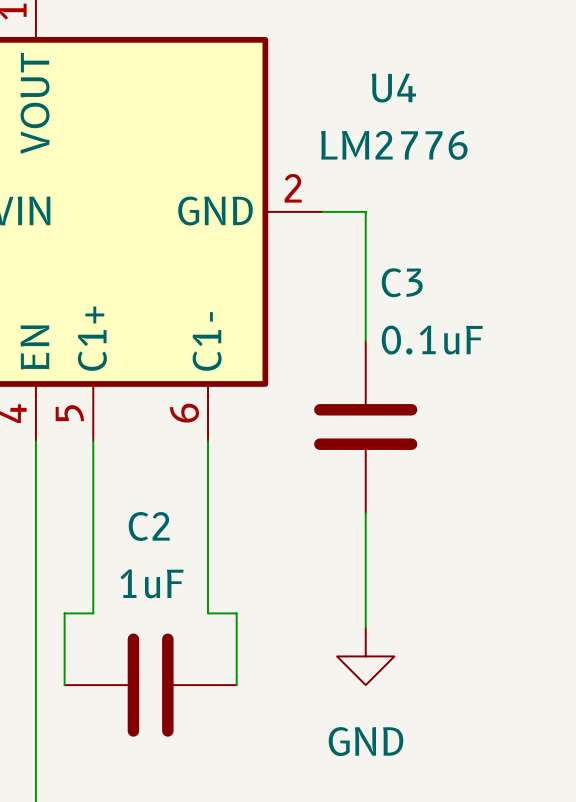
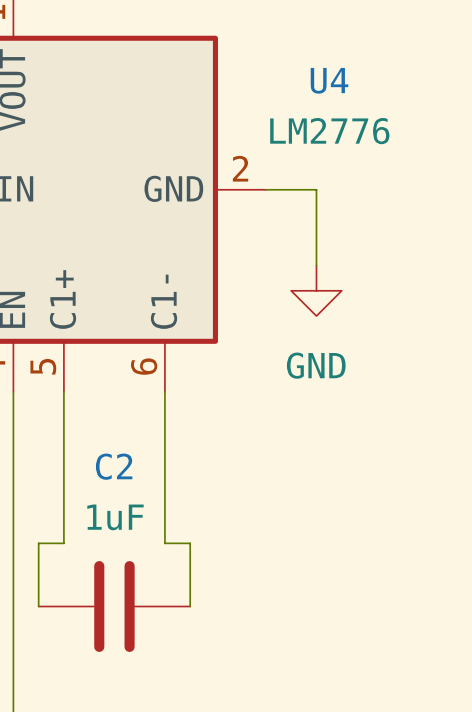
wire: (365, 211) (365, 340) -> (303, 189) (316, 189) (316, 265)
C3: 0.1uF (365, 426) -> none
wire: (365, 513) (365, 627) -> none
power symbol position: GND (365, 656) -> GND (316, 290)

